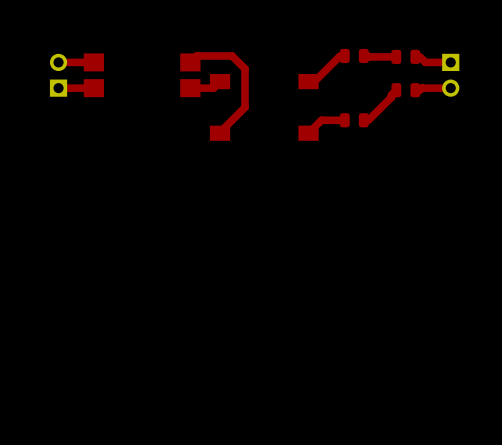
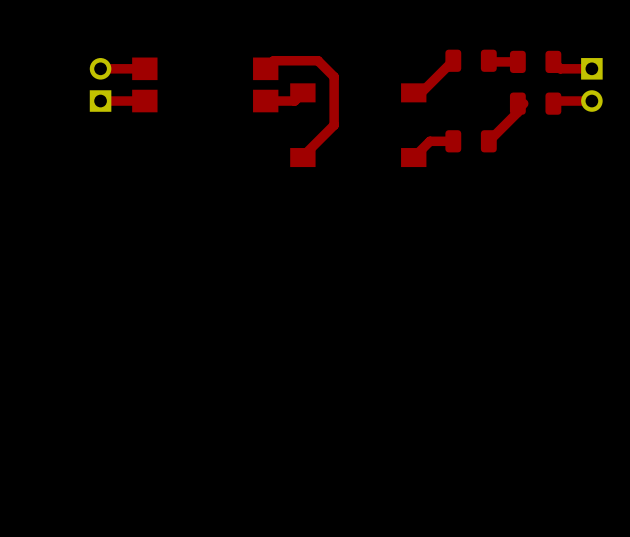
part footprint: [339, 48, 369, 64] -> [445, 49, 497, 72]
part footprint: [391, 49, 421, 64] -> [509, 50, 562, 73]
part footprint: [391, 83, 421, 98] -> [509, 92, 562, 115]
part footprint: [339, 113, 369, 128] -> [445, 130, 497, 153]

